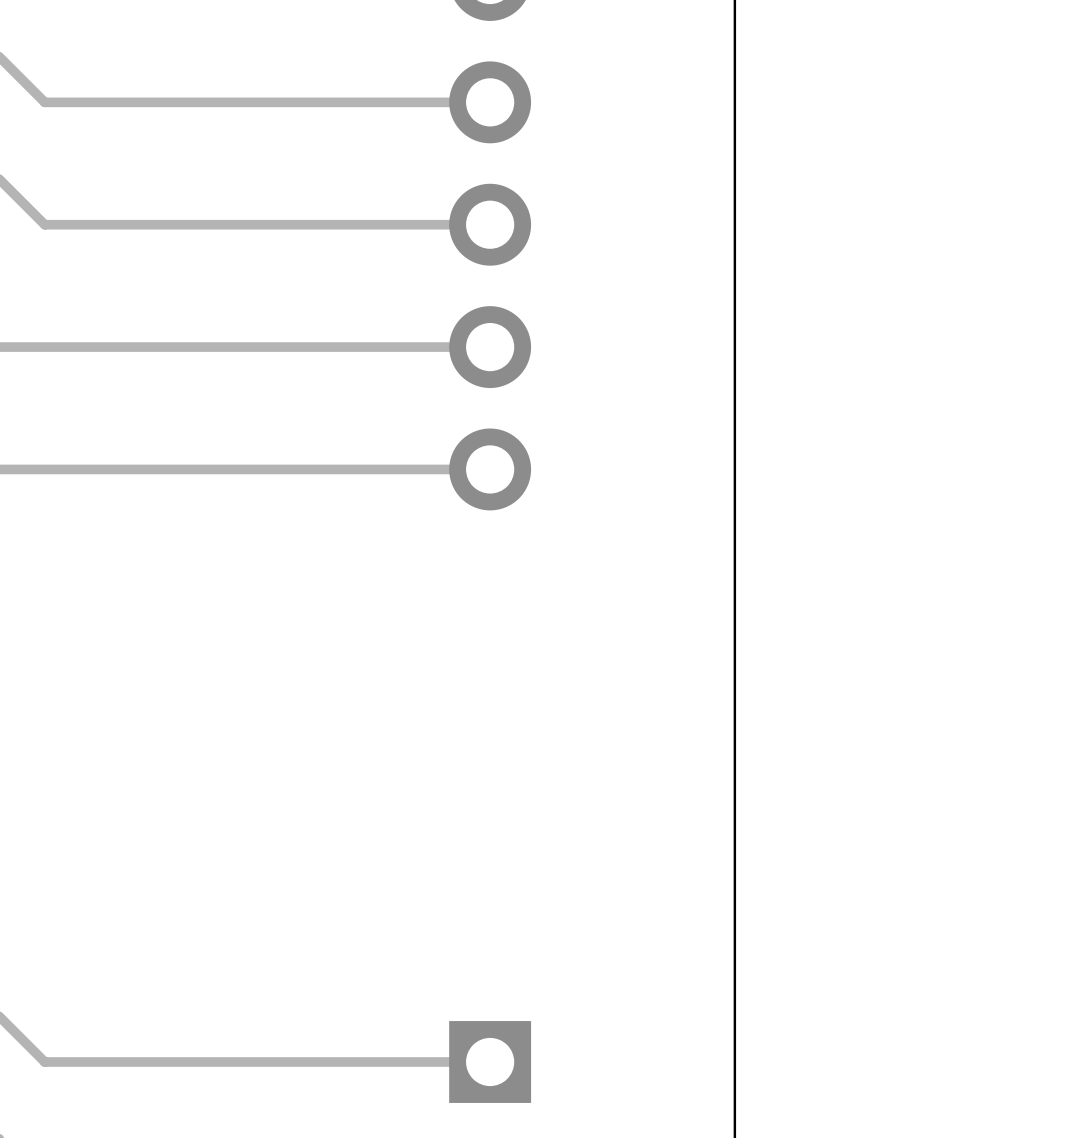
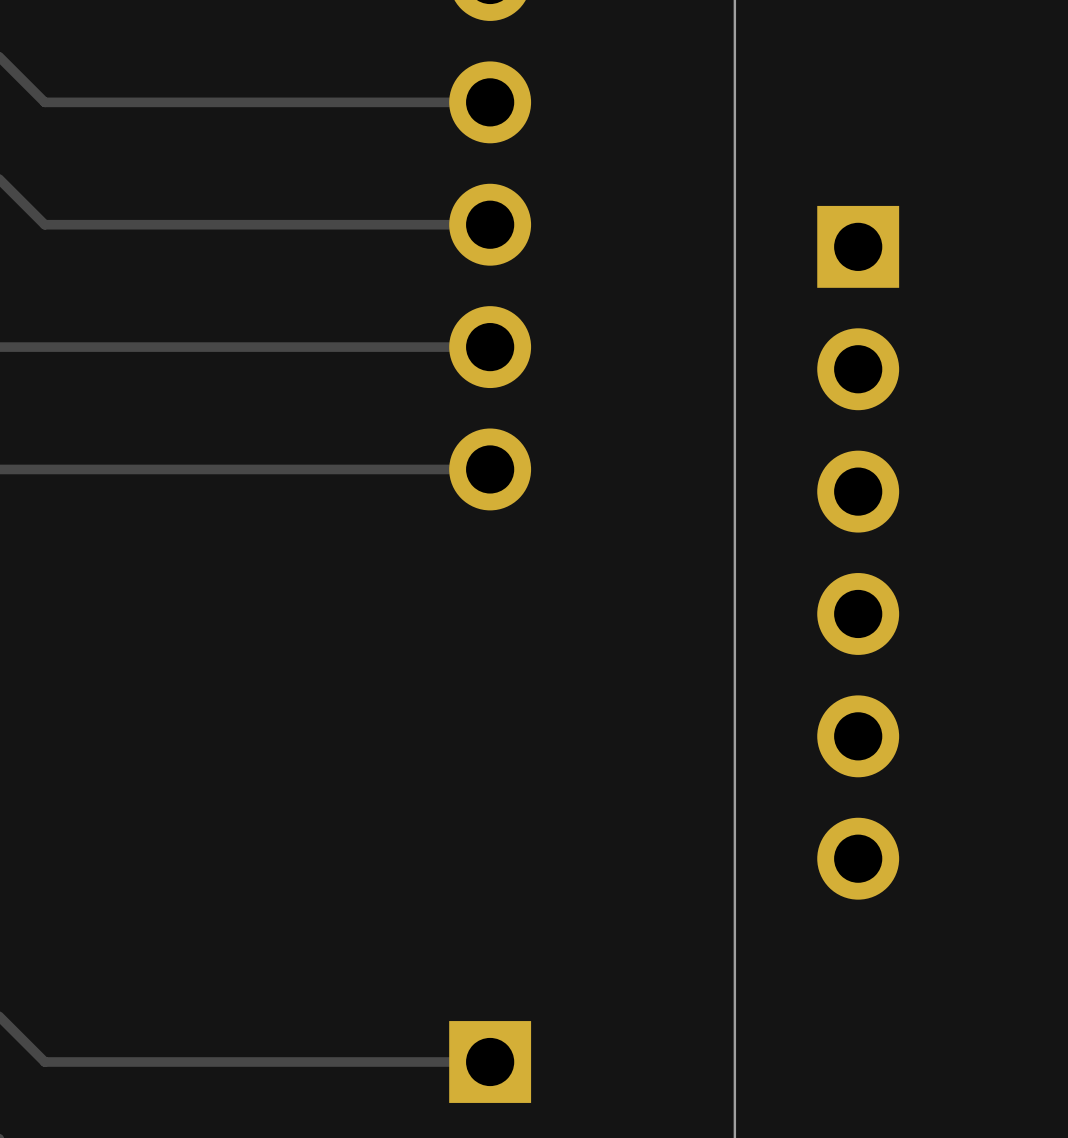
part: none -> (858, 552)

